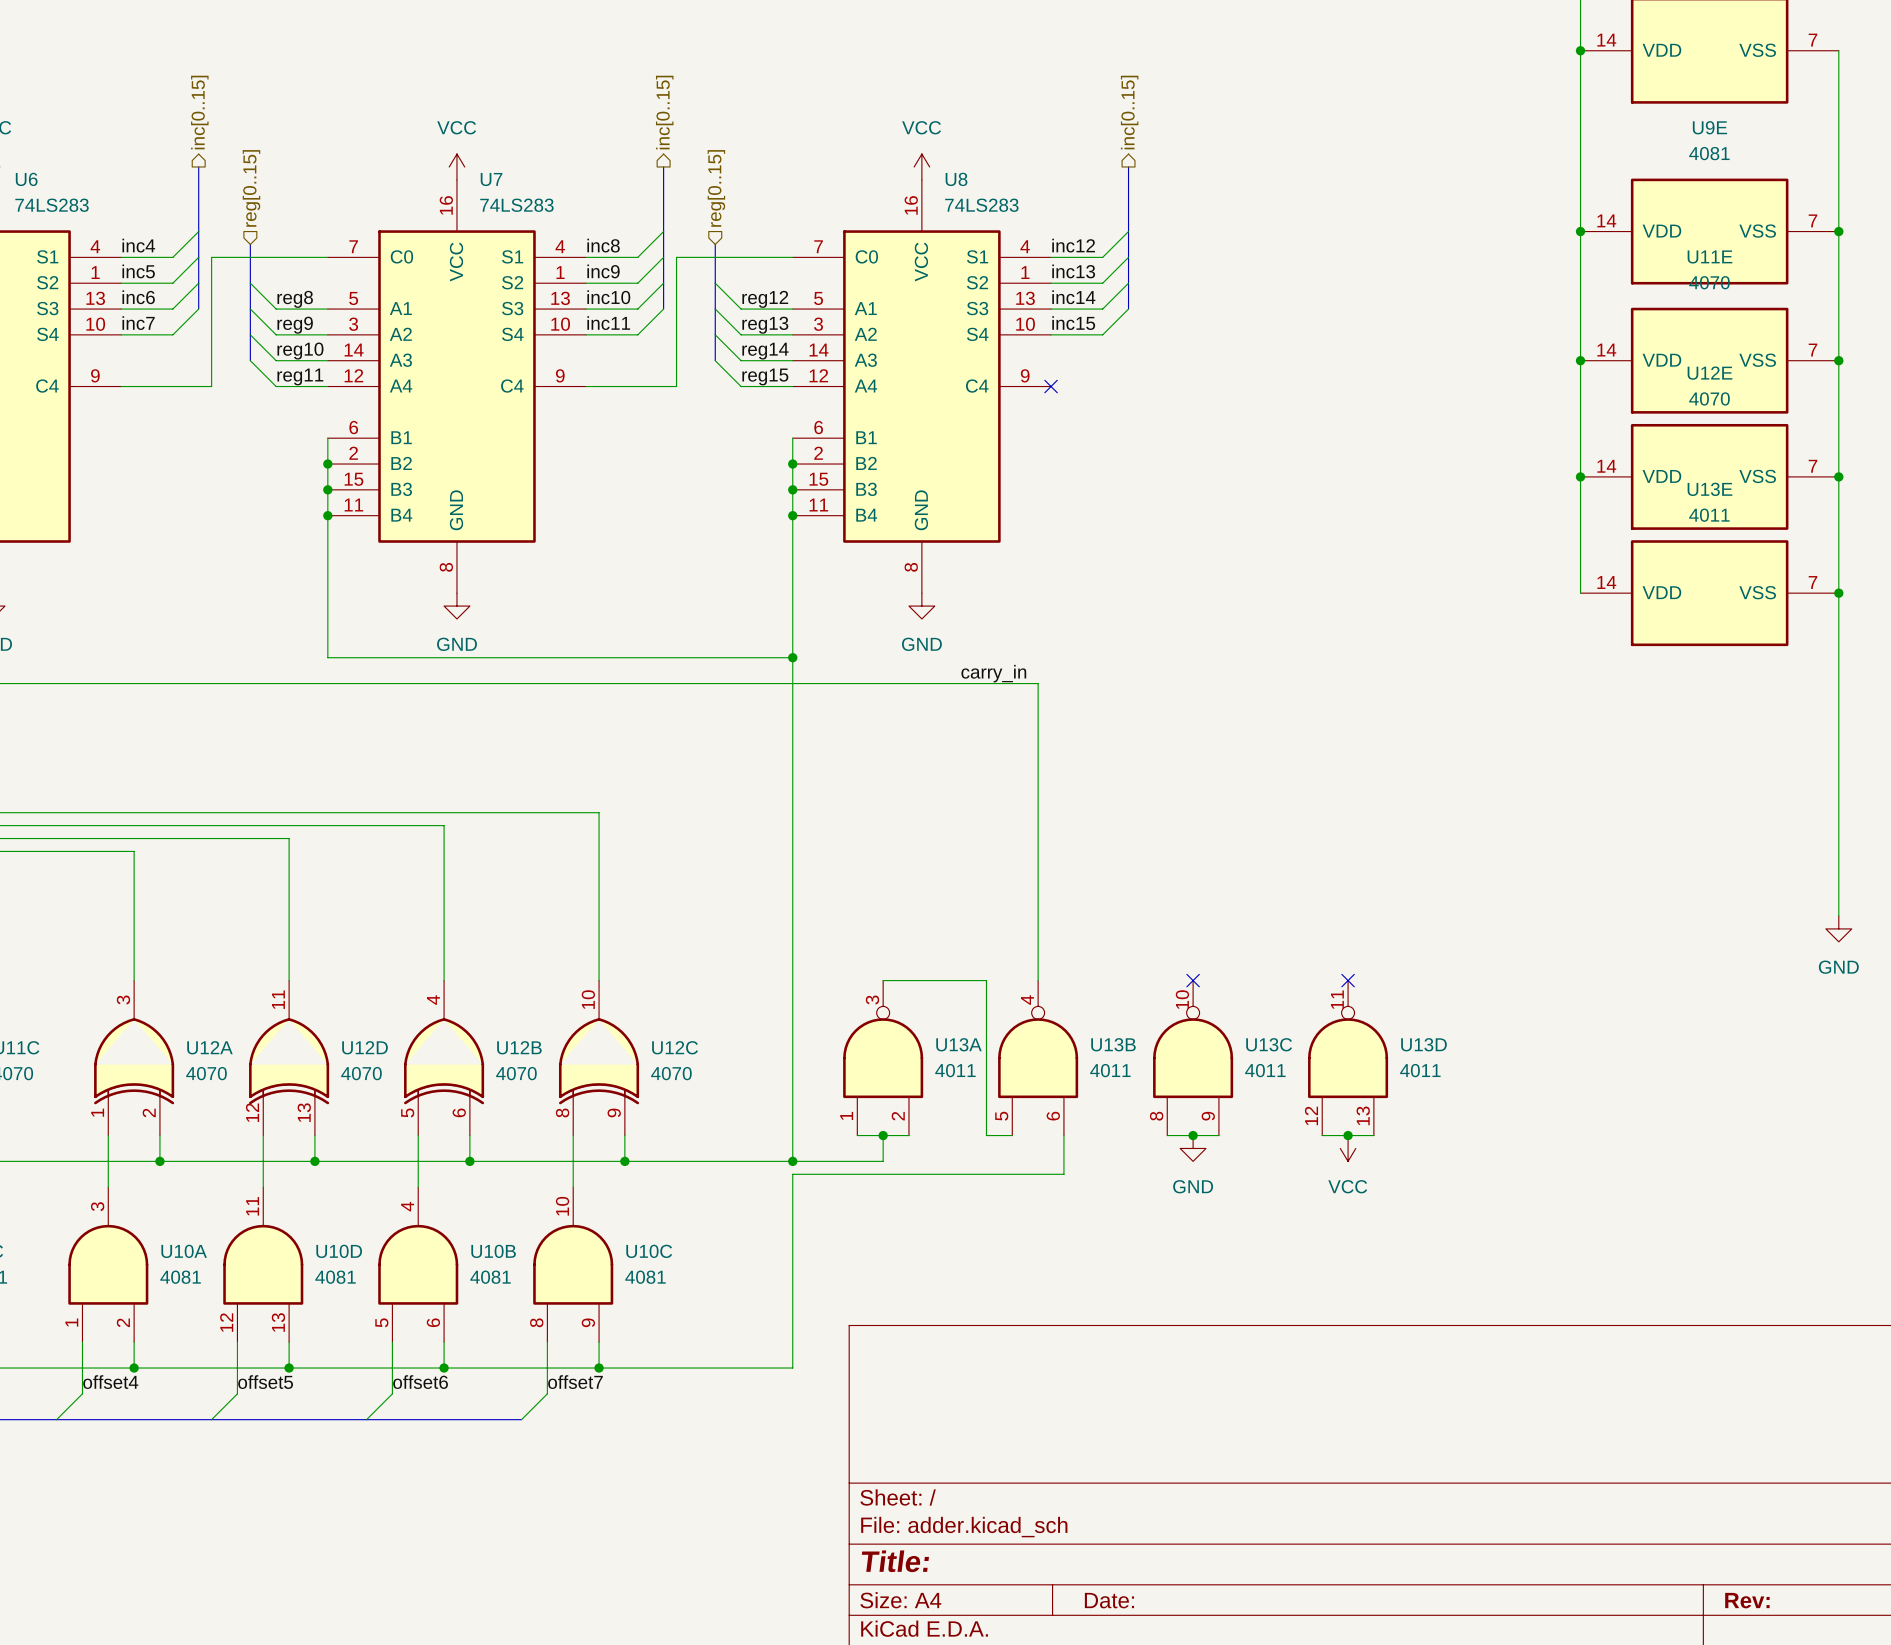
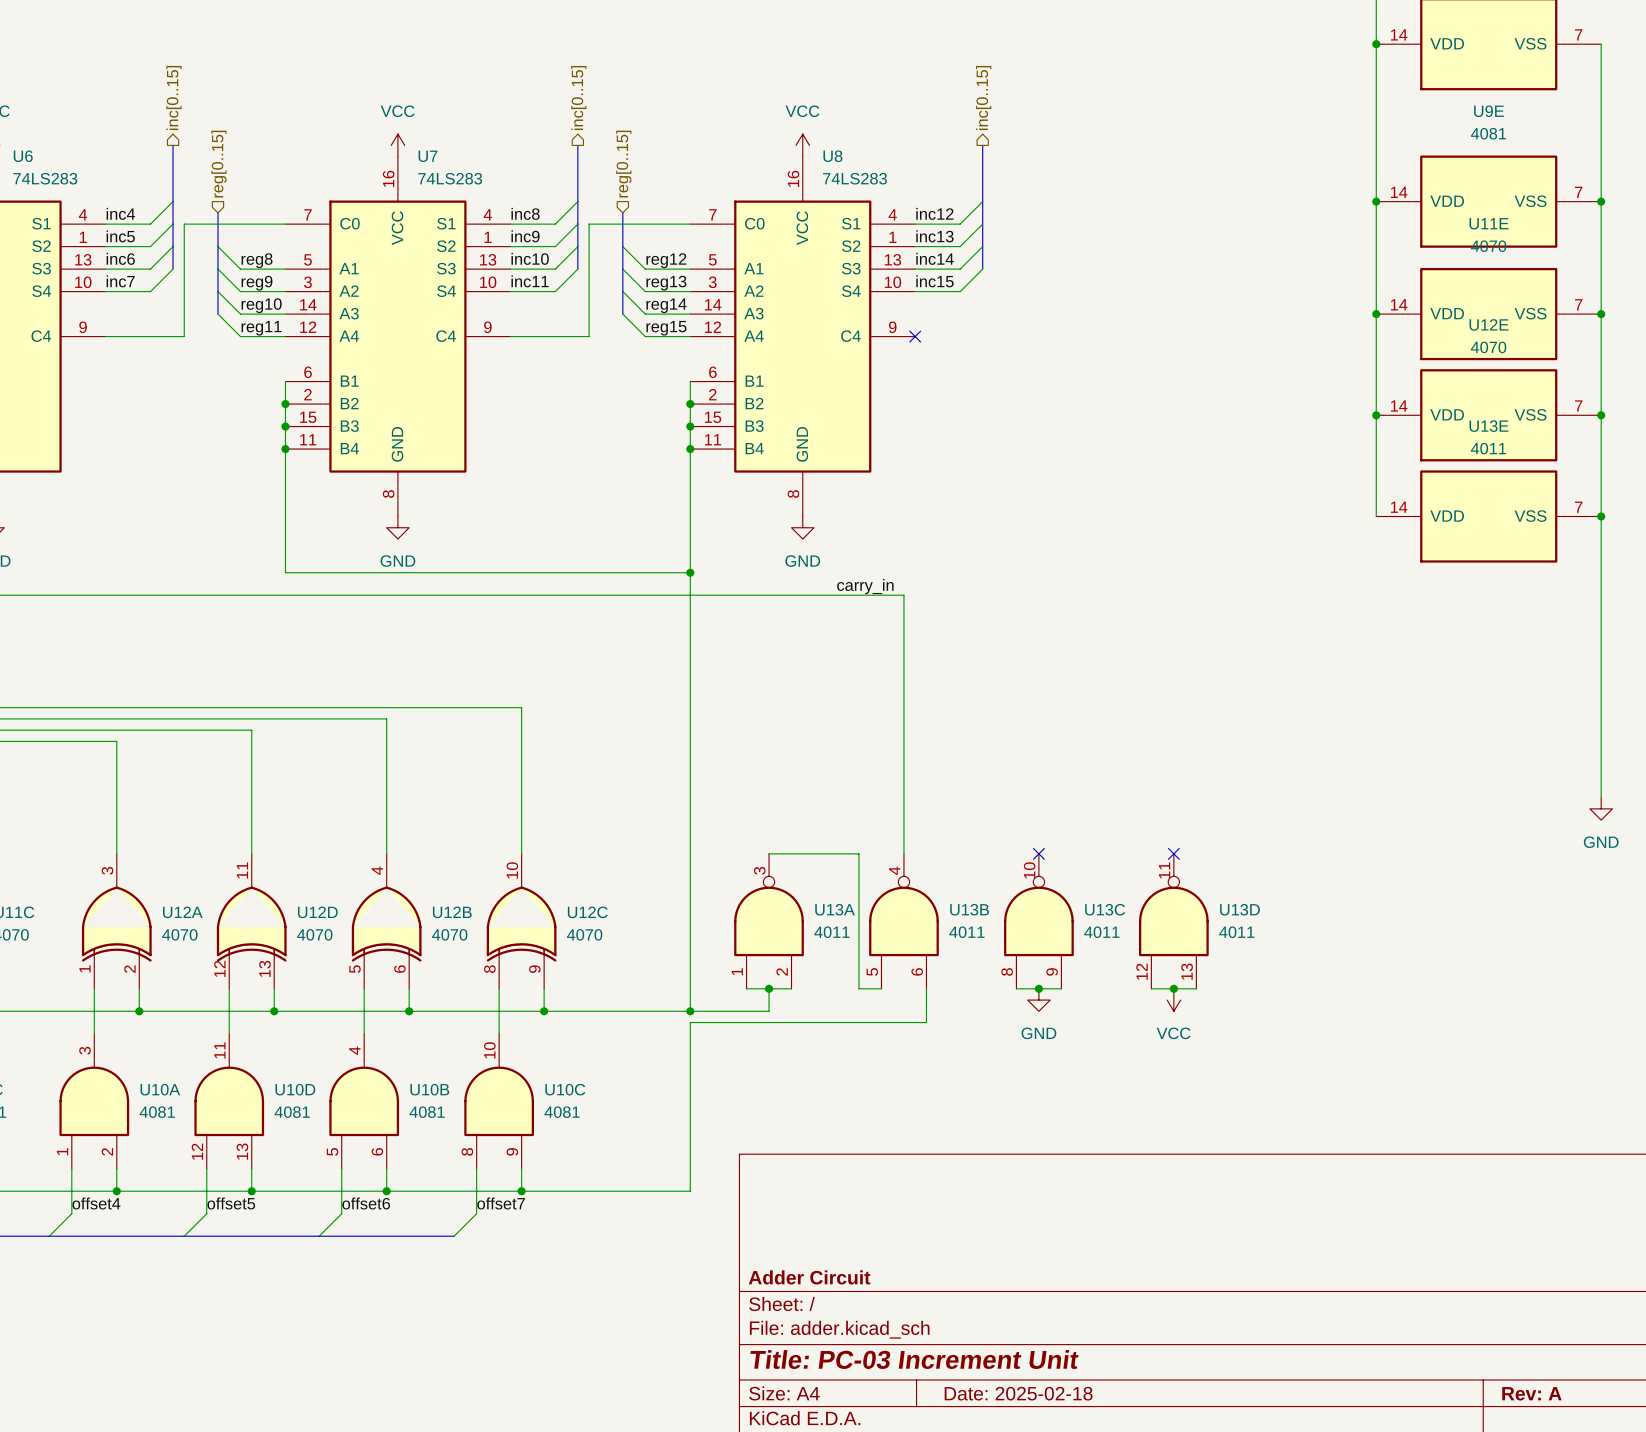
title block: none -> Adder Circuit (809, 1277)
title block: Title: (895, 1561) -> Title: PC-03 Increment Unit (914, 1359)
title block: Date: (1109, 1600) -> Date: 2025-02-18 (1018, 1393)
title block: Rev: (1747, 1600) -> Rev: A (1531, 1393)

